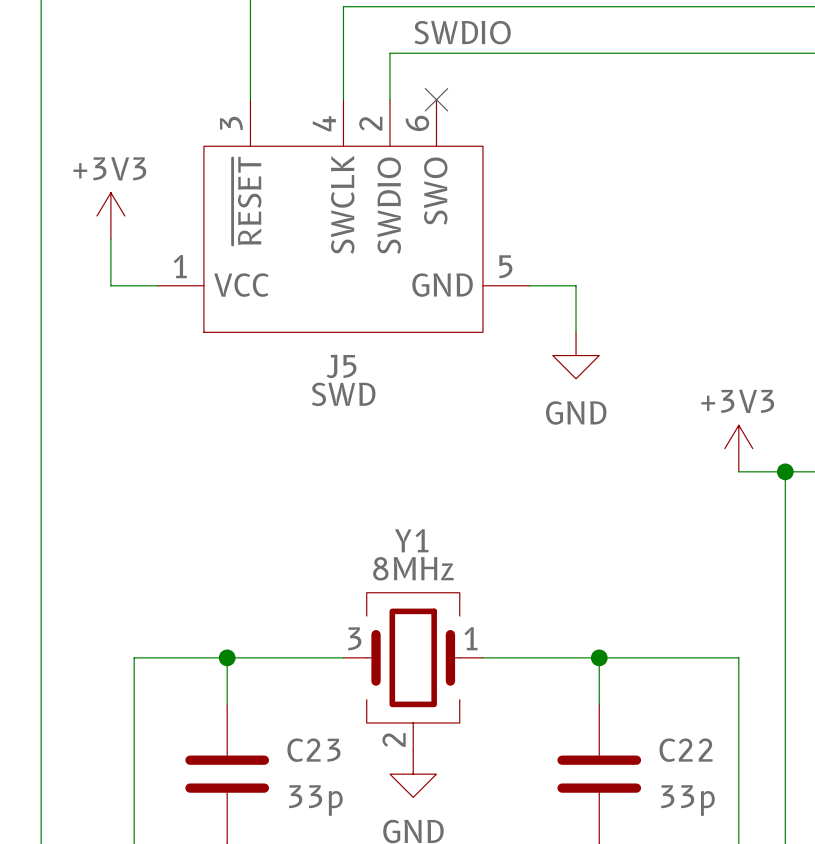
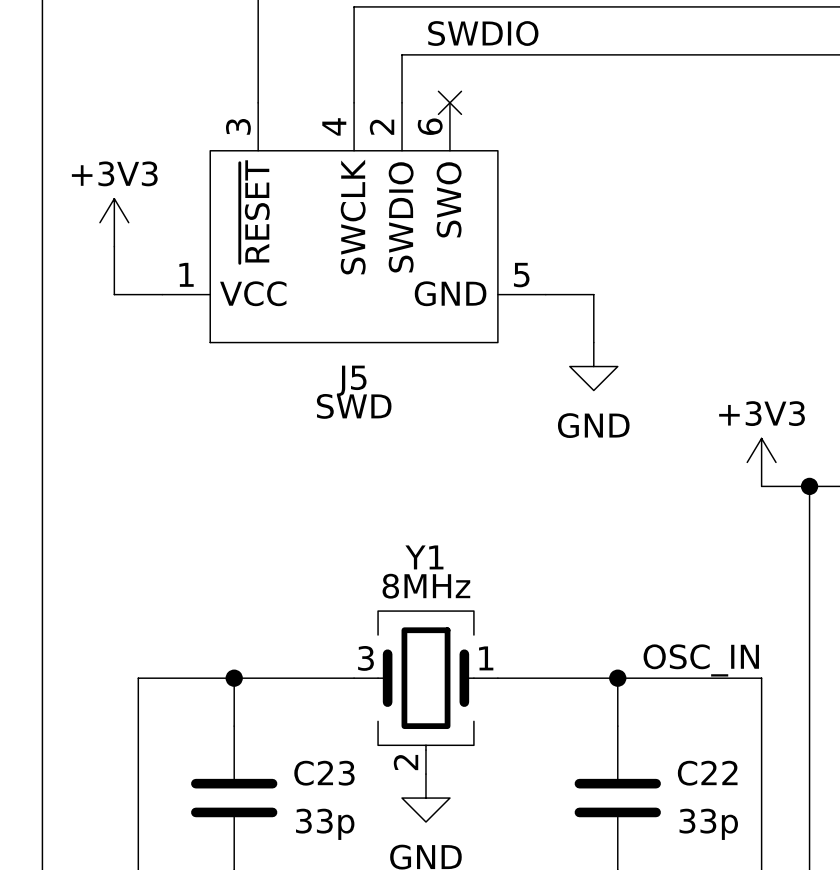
label: none -> OSC_IN (701, 660)

